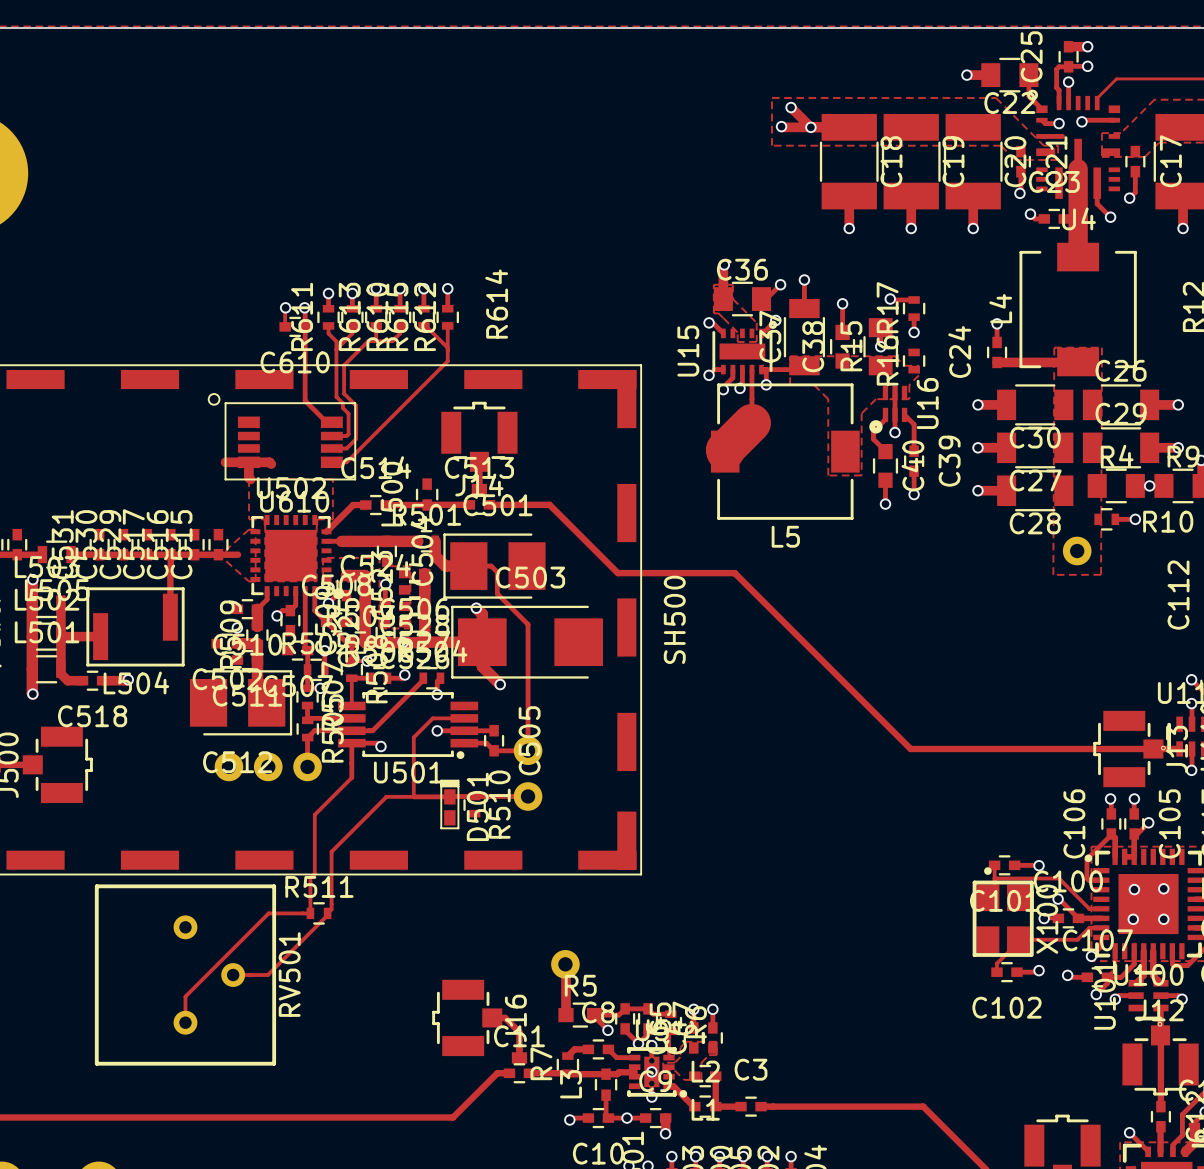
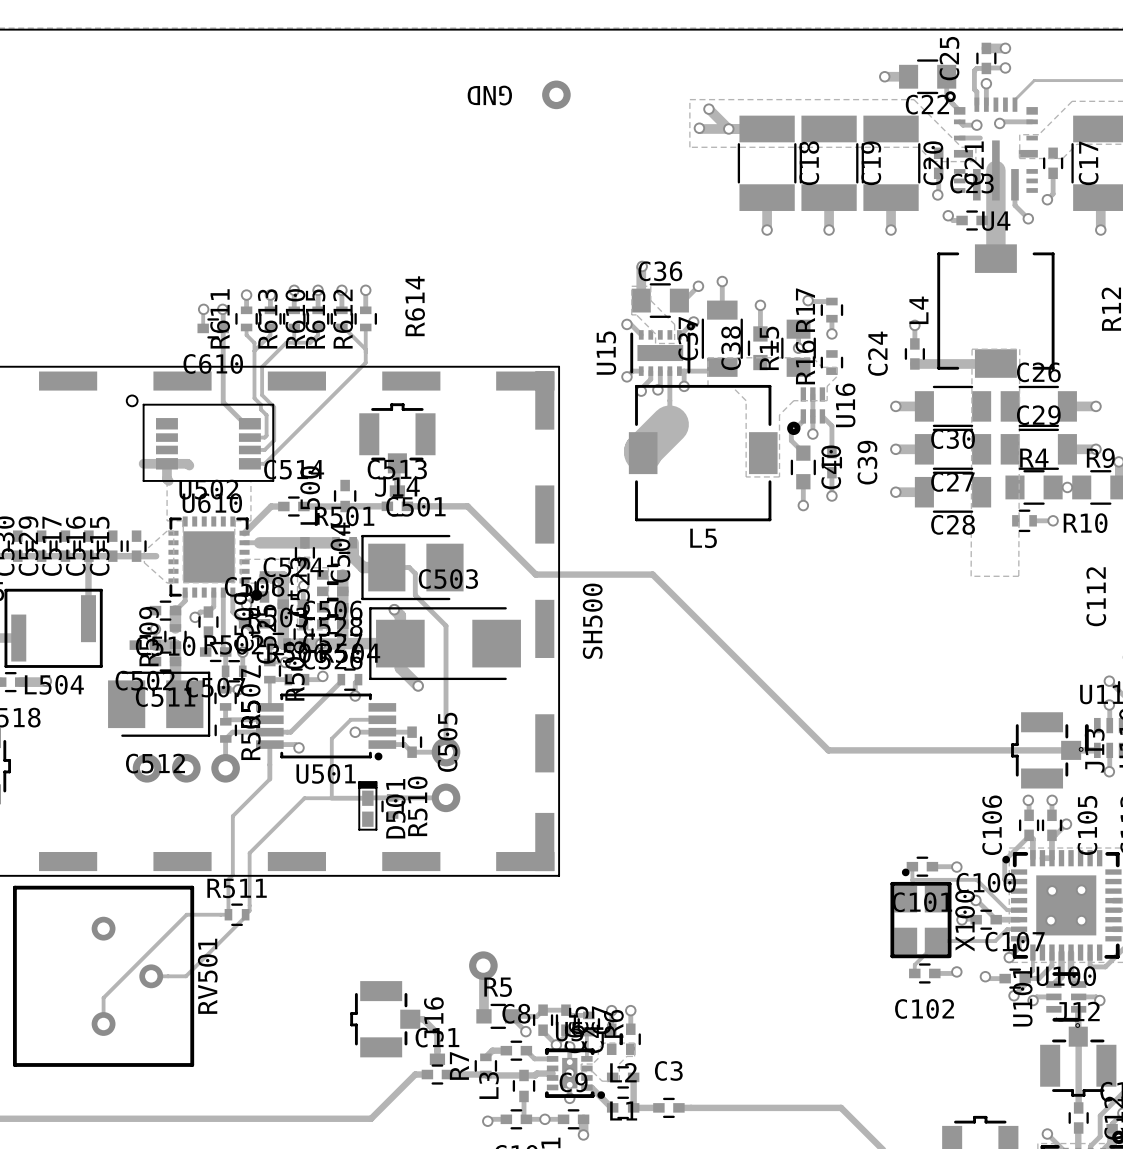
text: none -> GND (489, 95)
part: none -> (556, 94)
part: (1077, 551) -> none

